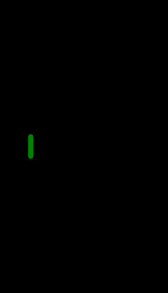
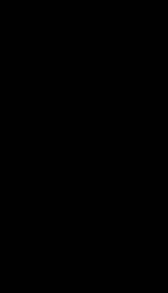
bottom track: (30, 136) (30, 156) -> none

